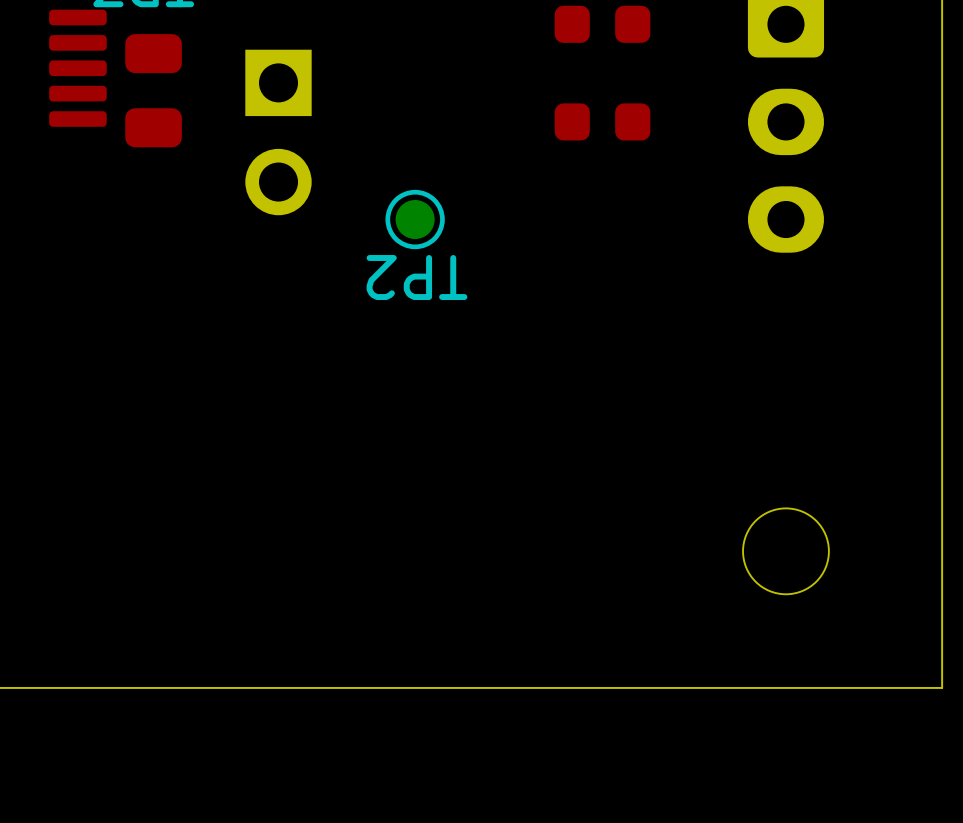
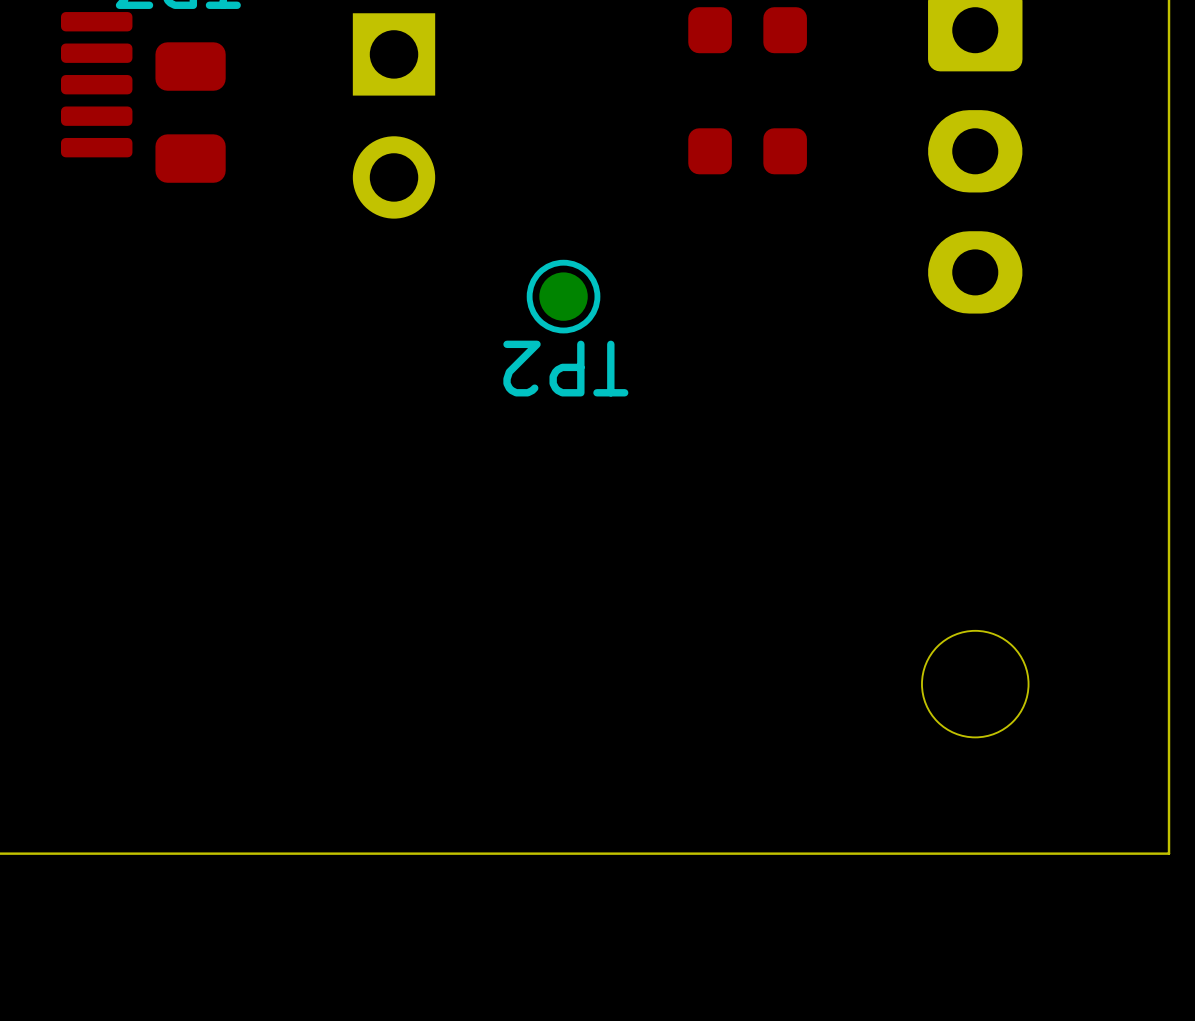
part position: (278, 132) -> (394, 115)
TP2 position: (415, 219) -> (563, 296)

